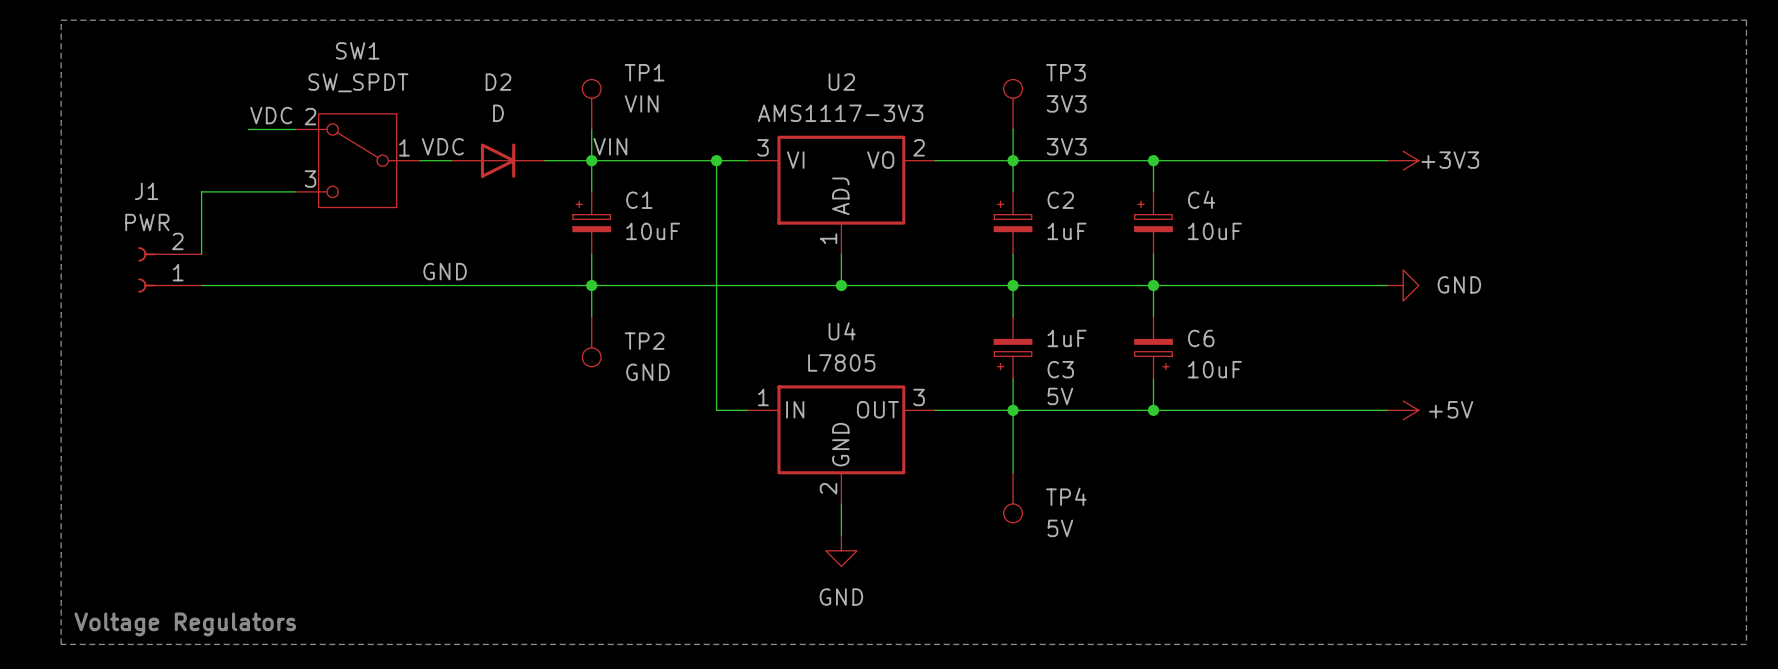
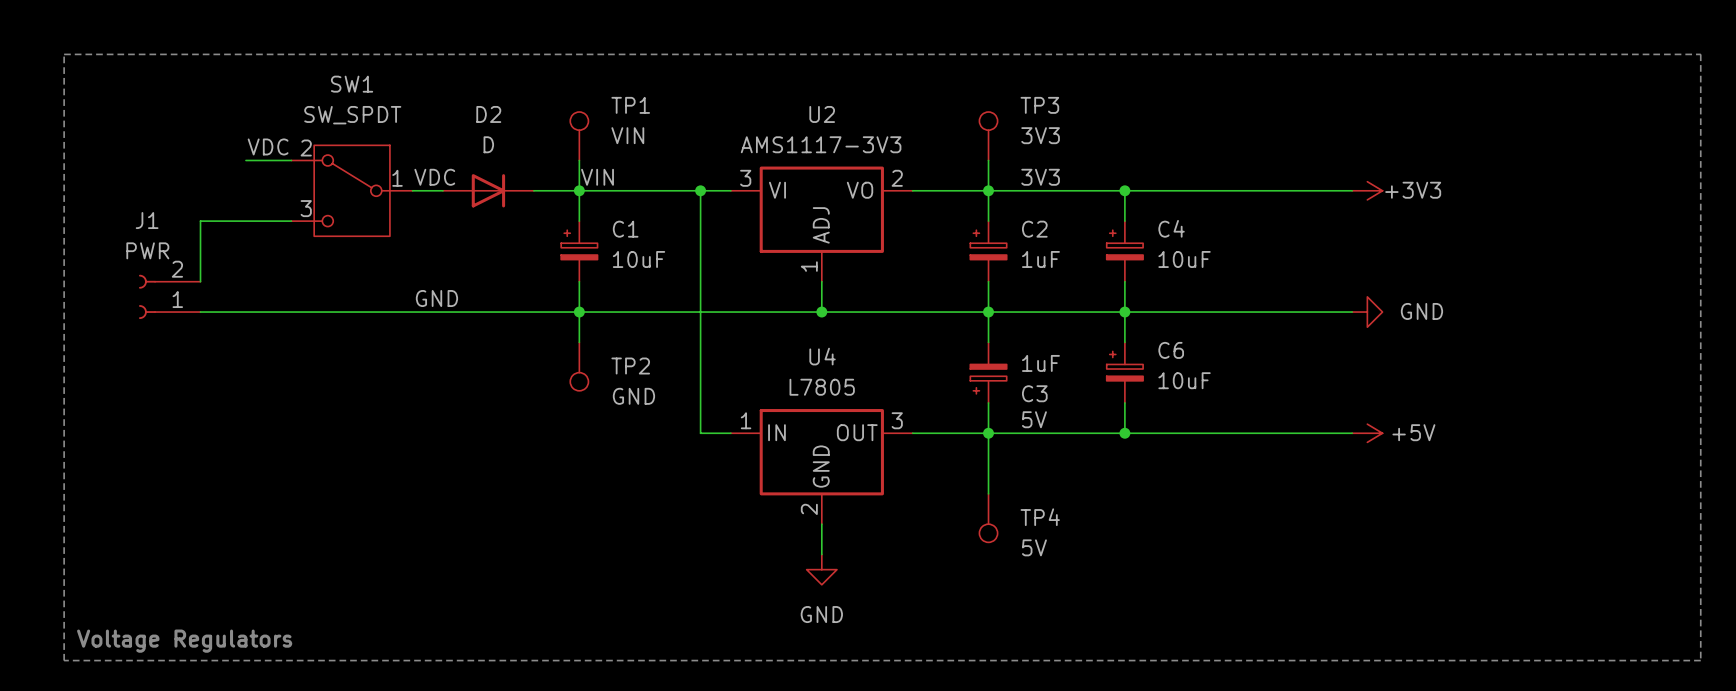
C6 rotation: 0° (1153, 354) -> 180° (1124, 366)

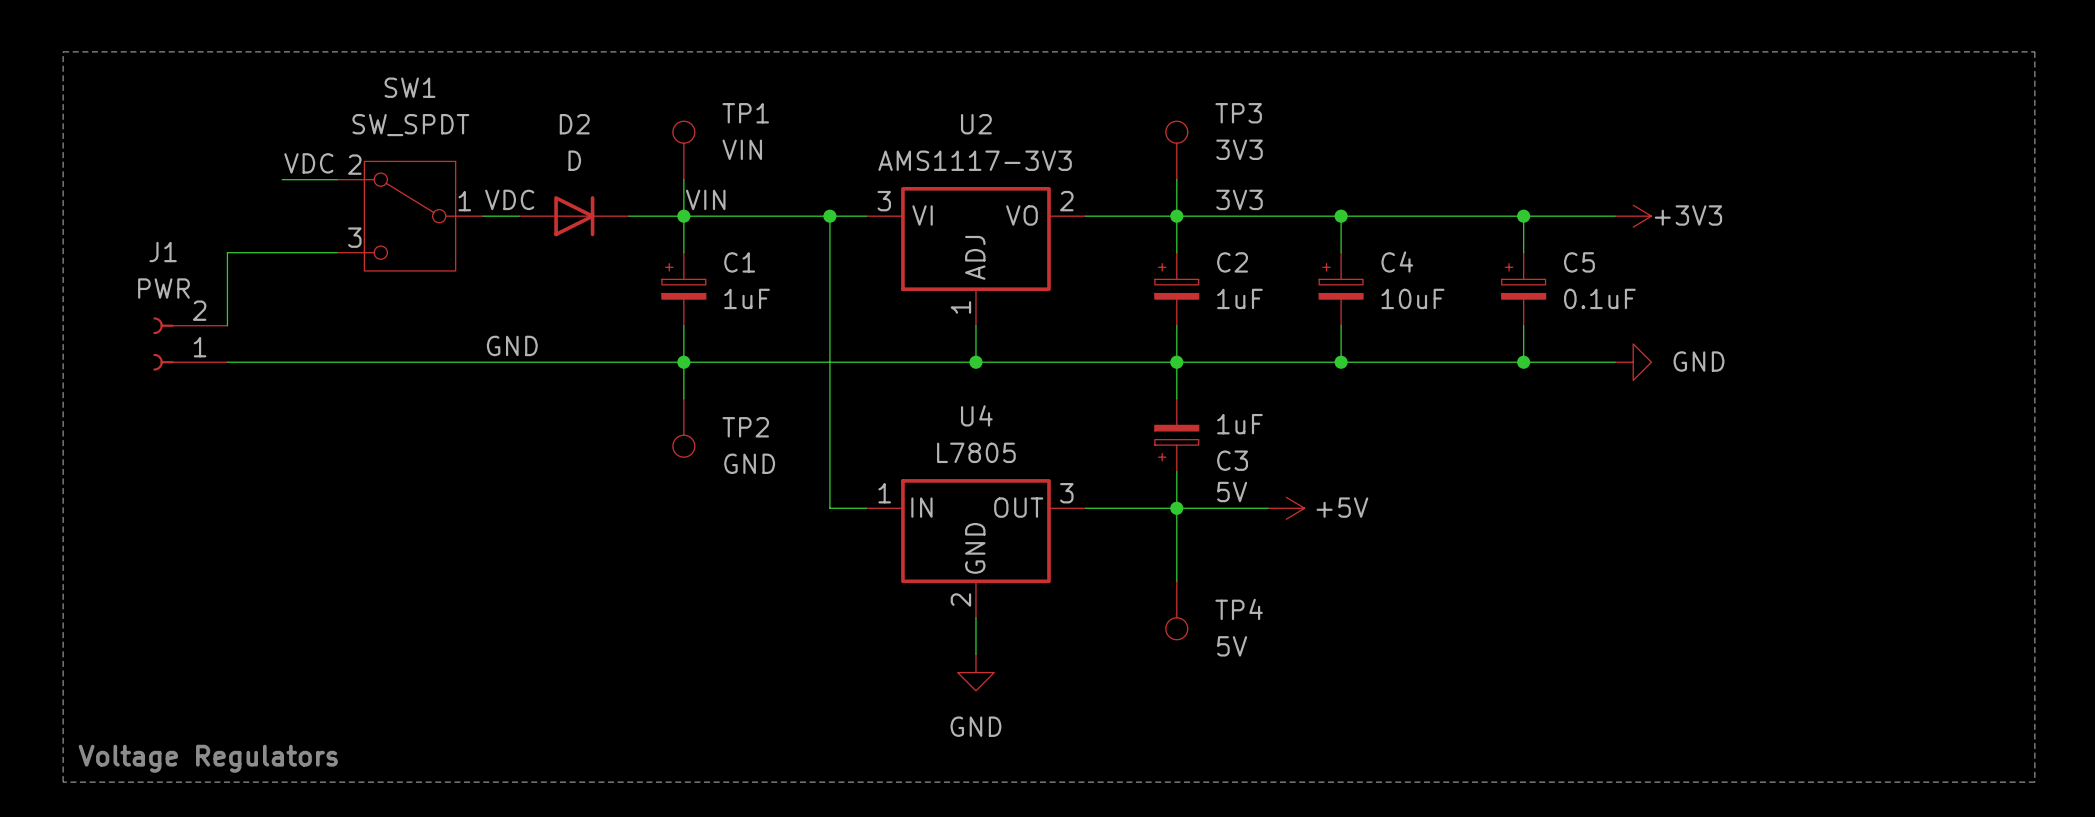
junction: none -> (1523, 216)
C5: none -> 0.1uF (1523, 289)
C1 value: 10uF (639, 259) -> 1uF (747, 298)
wire: (1124, 312) (1124, 342) -> (1523, 325) (1523, 362)
junction: none -> (1523, 362)
C6: 10uF (1124, 372) -> none
wire: (1124, 402) (1124, 433) -> (1523, 216) (1523, 252)
wire: (1064, 433) (1352, 433) -> none
junction: (1124, 433) -> none
power symbol position: +5V (1367, 433) -> +5V (1286, 508)

